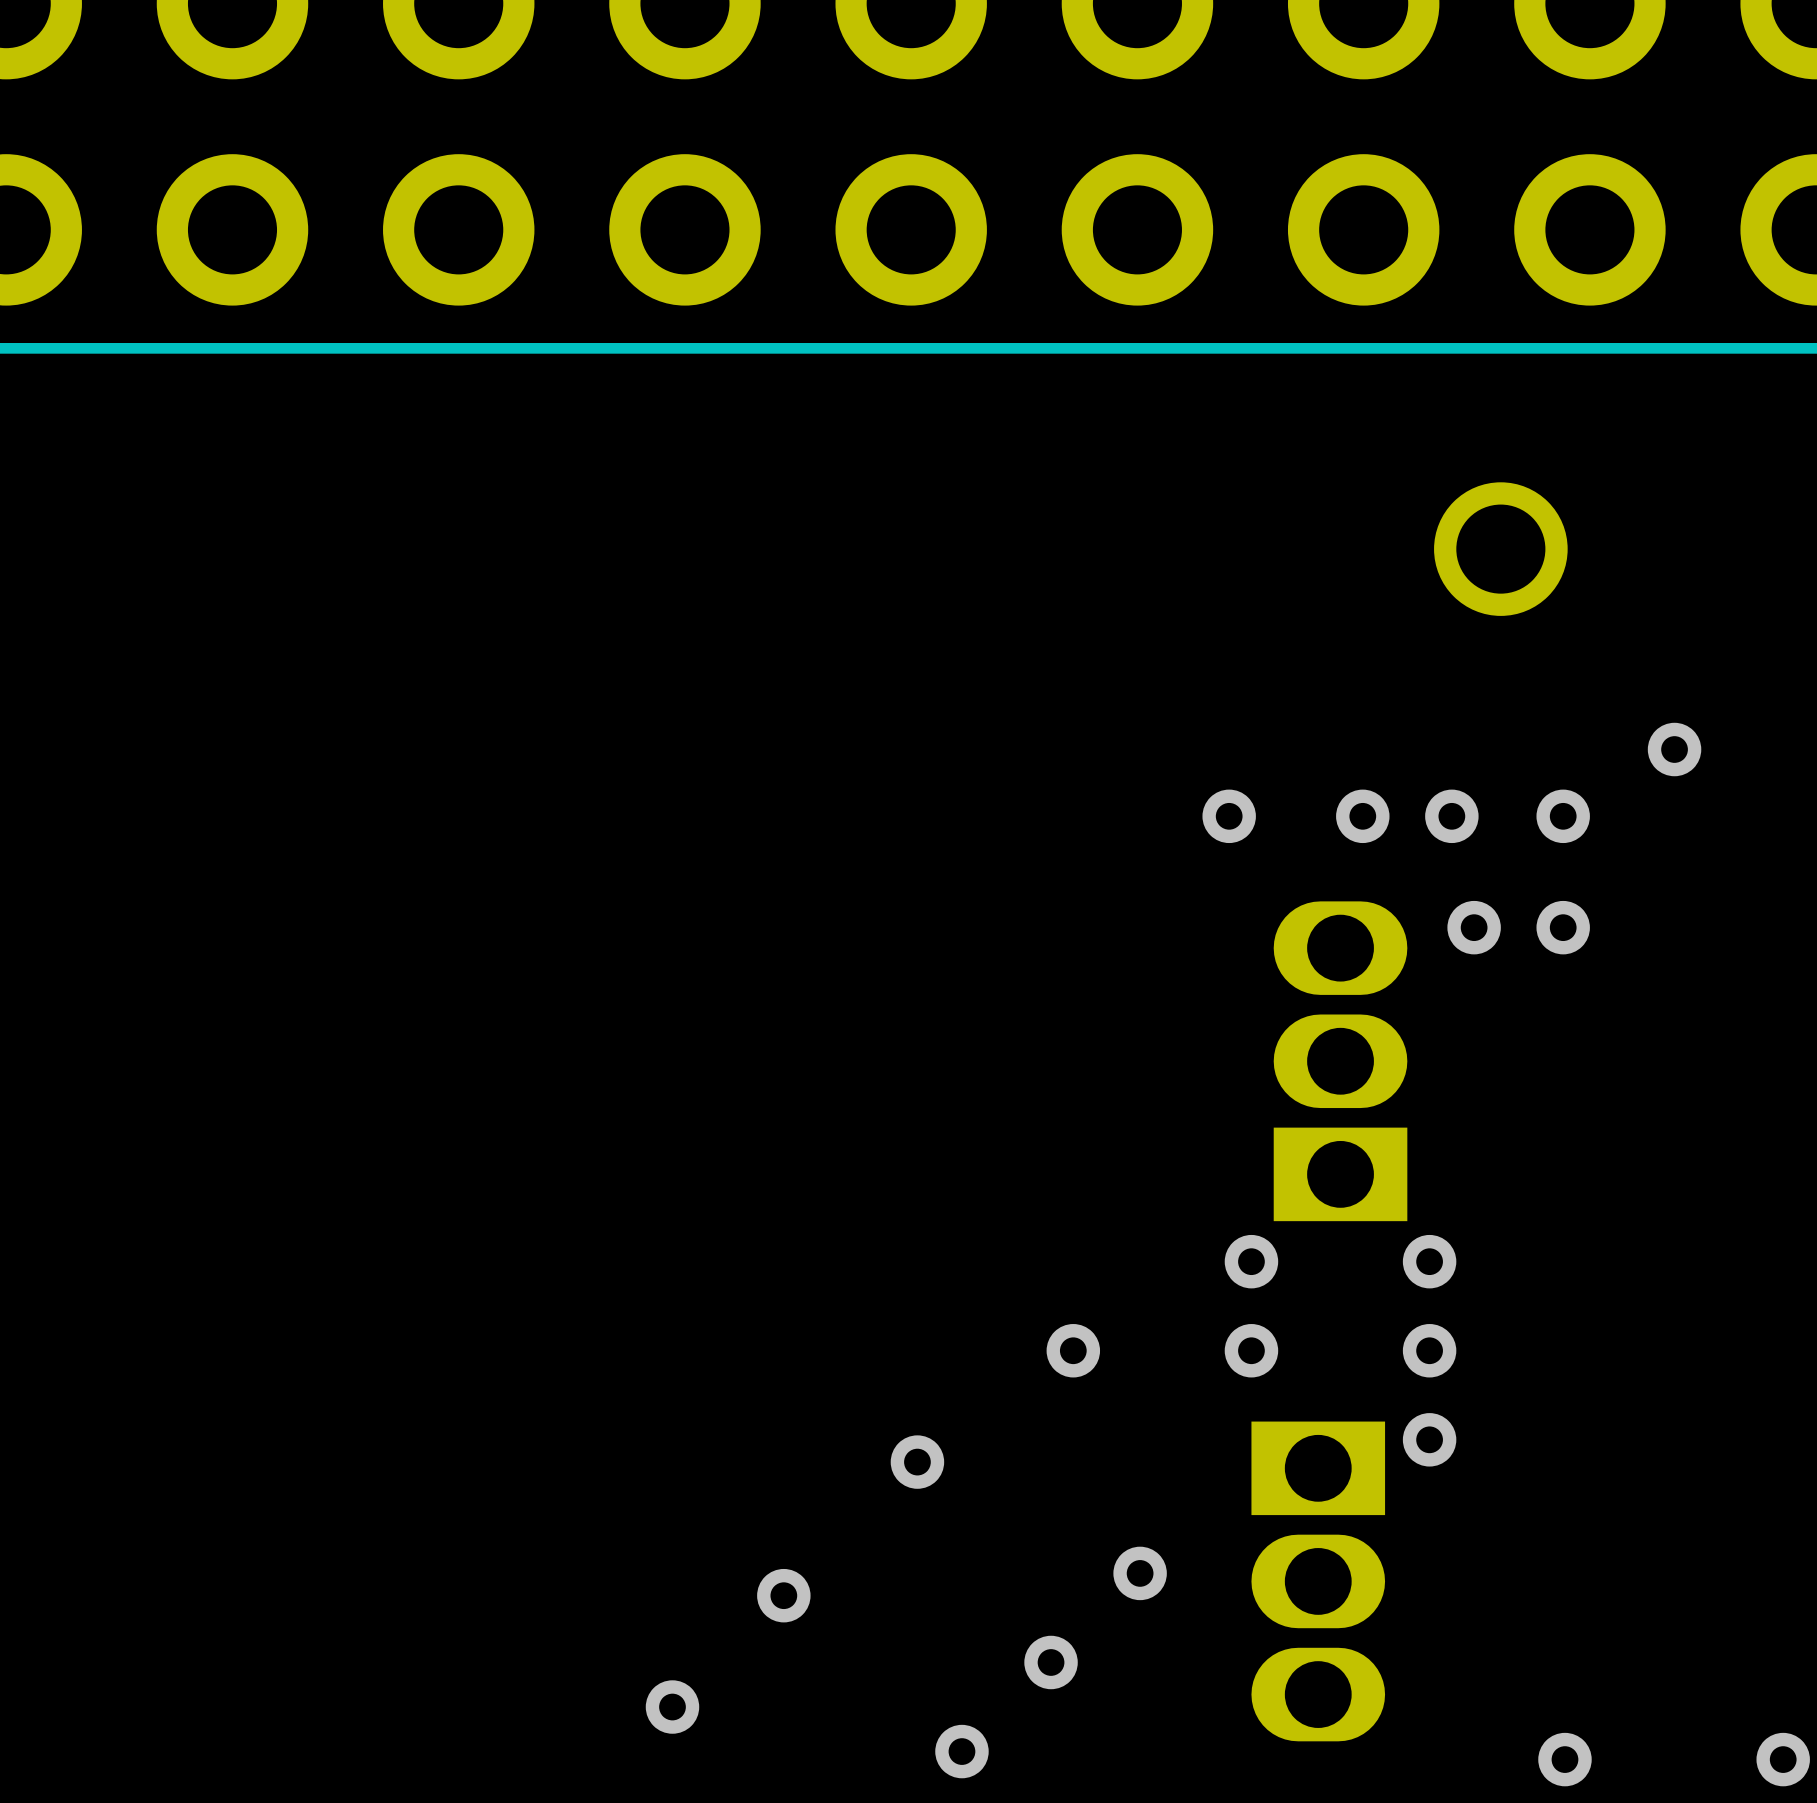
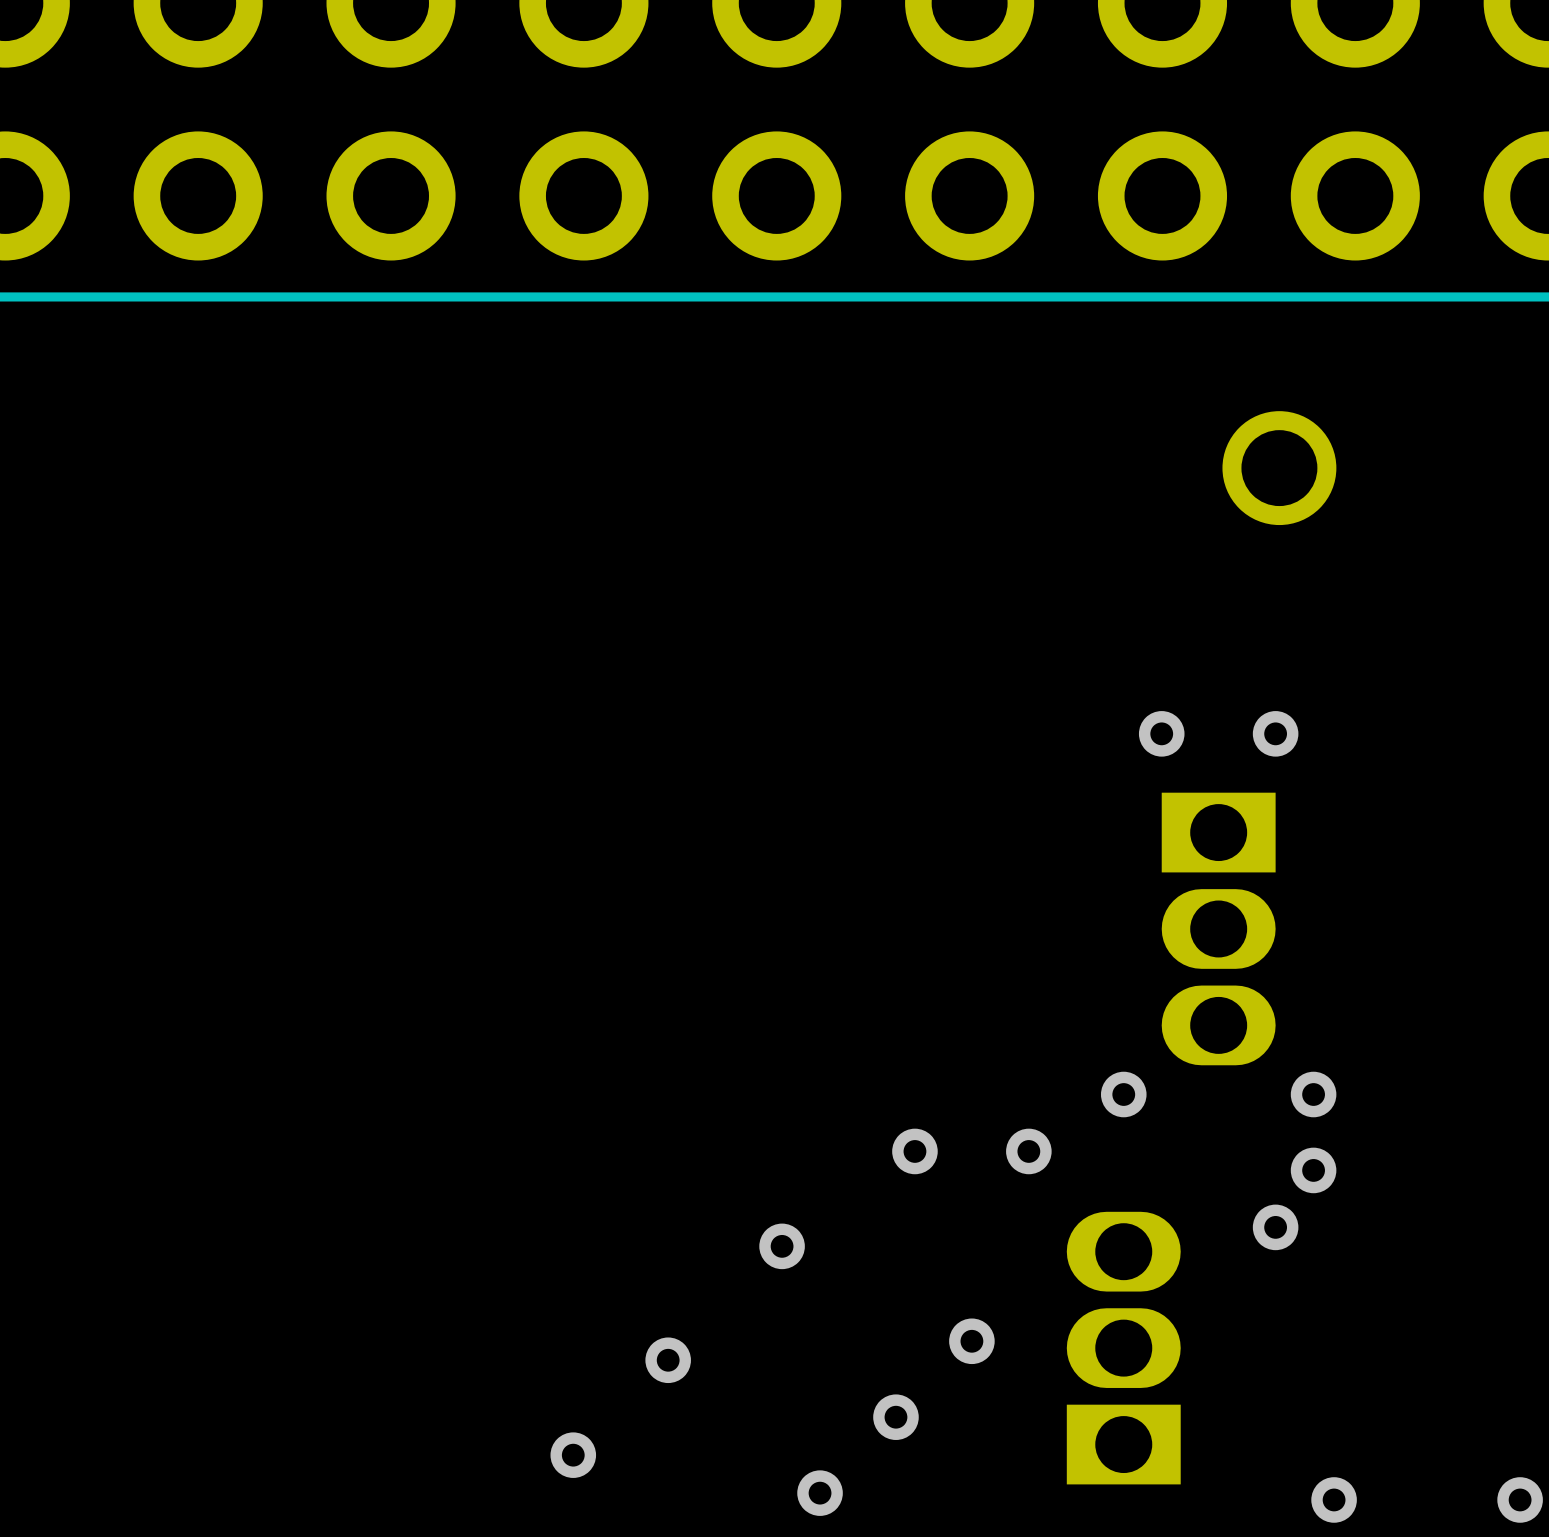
via: (1674, 749) -> none
via: (1229, 816) -> none
via position: (1362, 816) -> (1161, 733)
via position: (1451, 816) -> (1275, 733)
via: (1563, 816) -> none
via: (1474, 927) -> none
via: (1563, 927) -> none
part rotation: 0° (1340, 1061) -> 180° (1218, 928)
via: (1251, 1261) -> none
via: (1429, 1261) -> none
via: none -> (1123, 1094)
via: none -> (1313, 1094)
via position: (1251, 1350) -> (1028, 1151)
via: (1429, 1350) -> none
via: none -> (1313, 1170)
via: (1429, 1439) -> none
via: none -> (1275, 1227)
part rotation: 0° (1318, 1581) -> 180° (1123, 1348)

